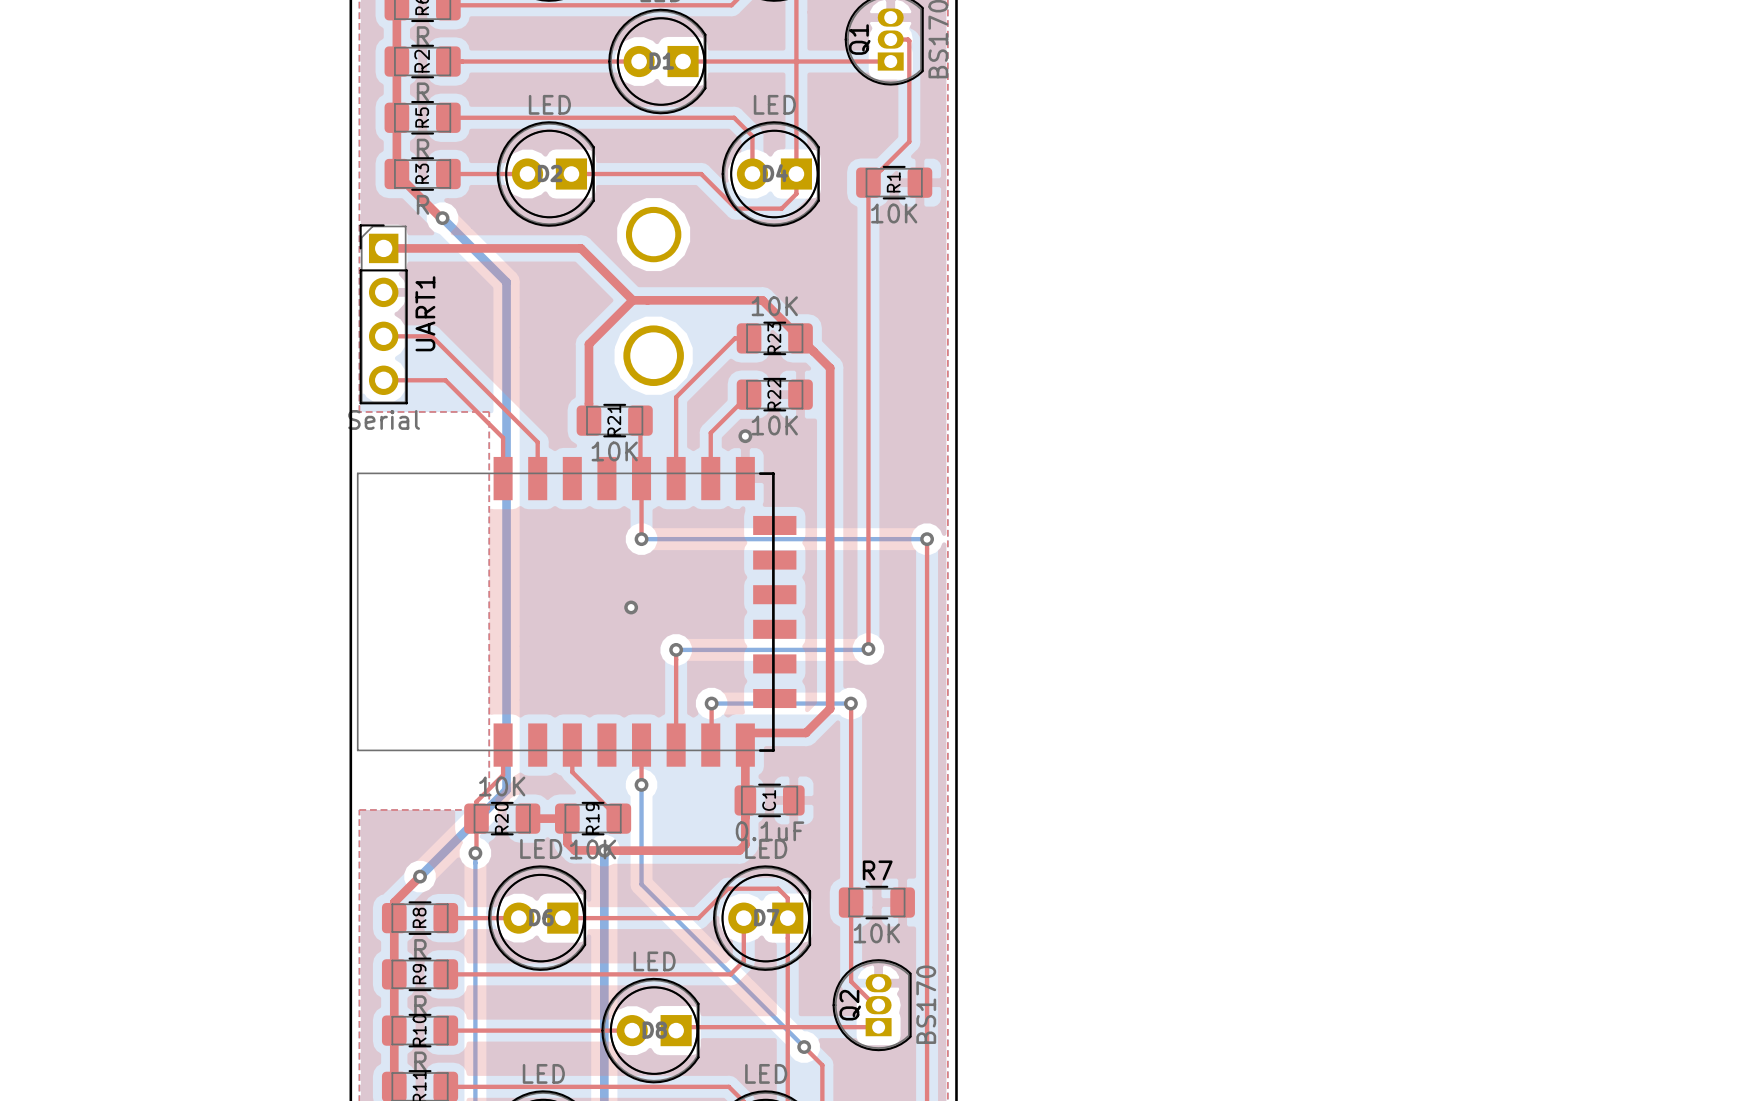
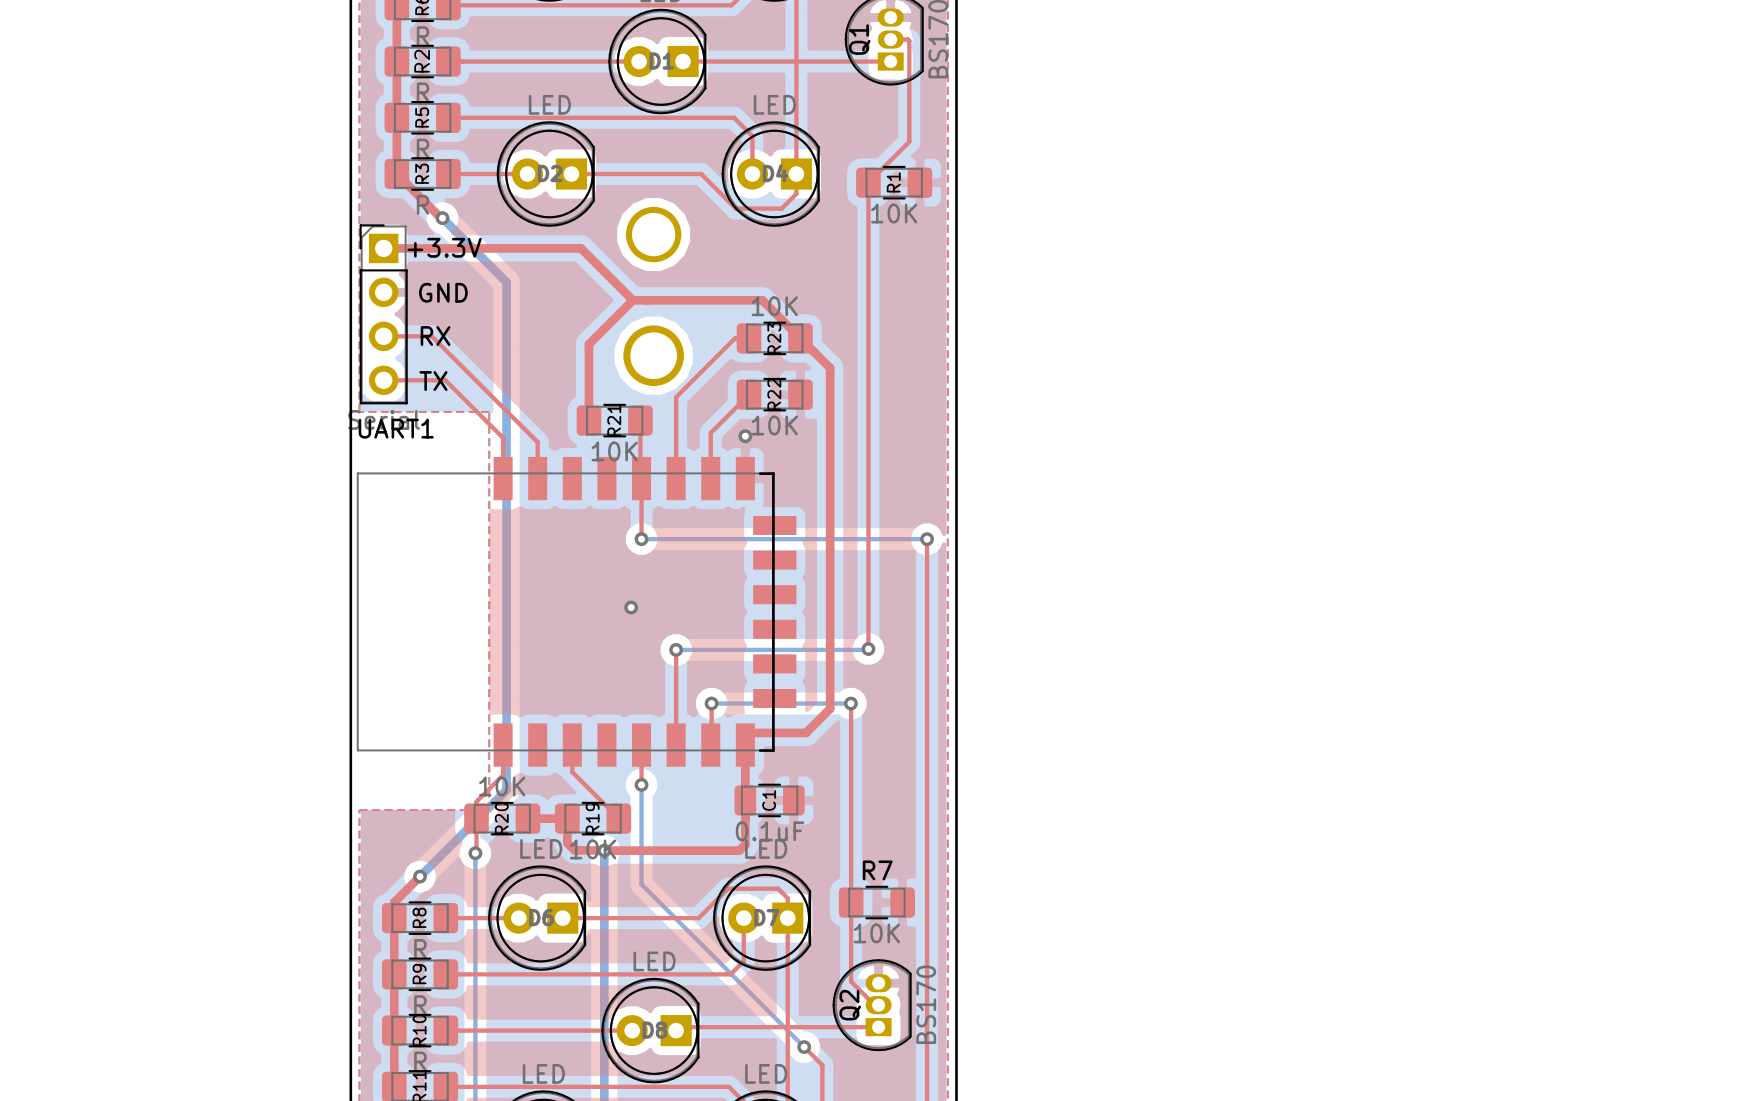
text: none -> +3.3V (444, 247)
text: none -> GND (443, 292)
UART1 name rotation: 0° (425, 313) -> 90° clockwise (396, 428)
UART1 name position: UART1 (425, 313) -> UART1 (396, 428)
text: none -> RX (435, 336)
text: none -> TX (433, 381)

